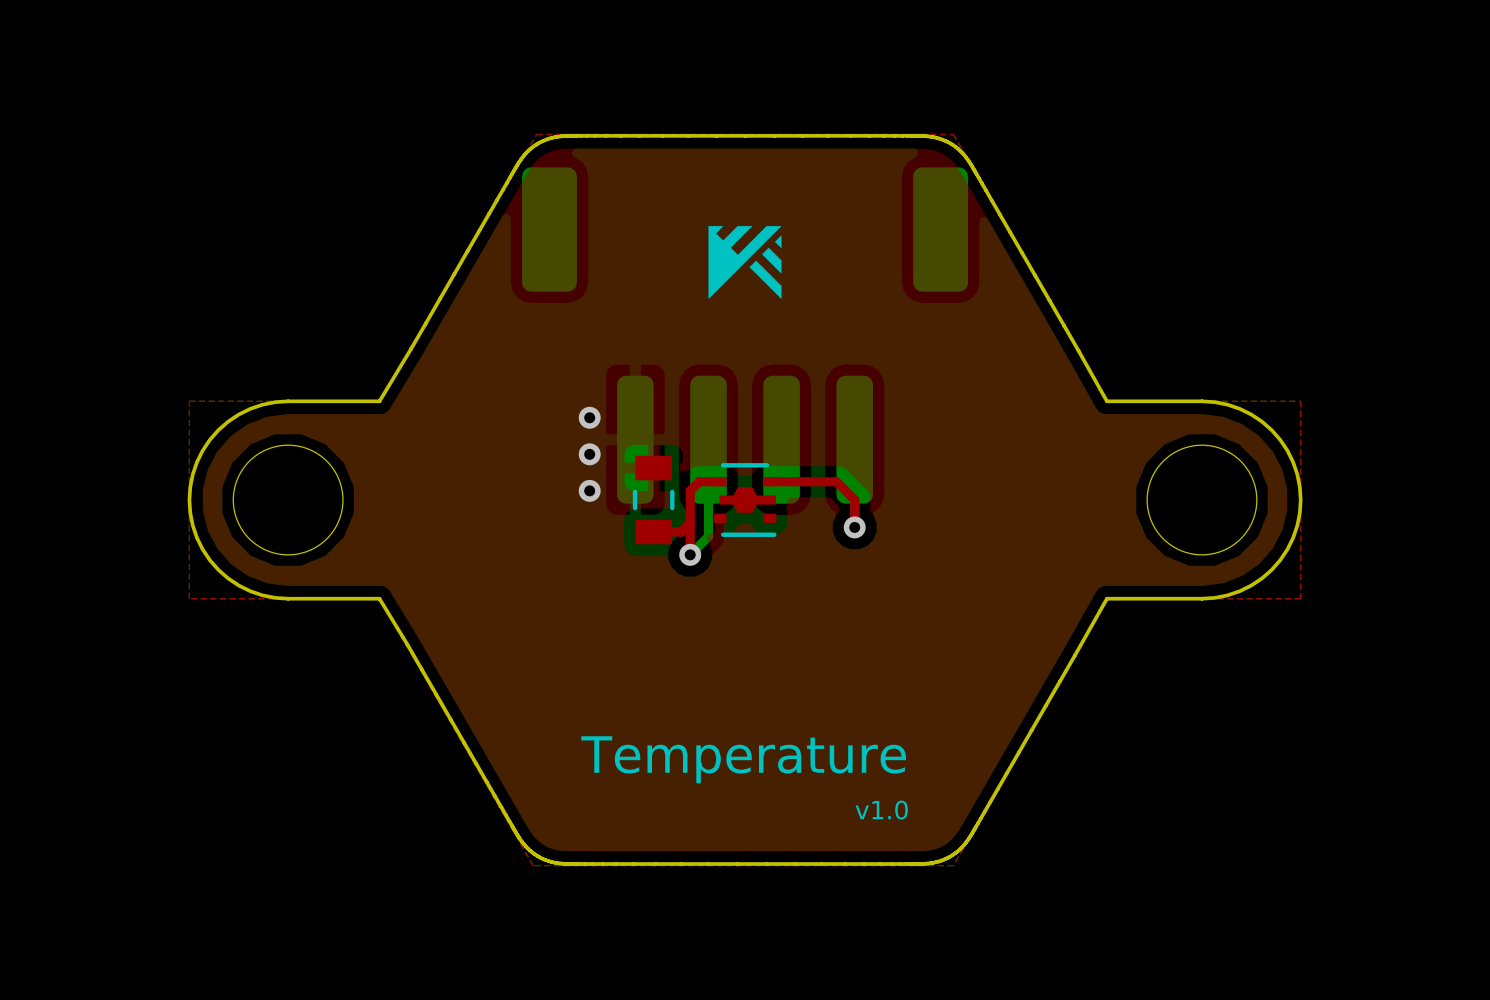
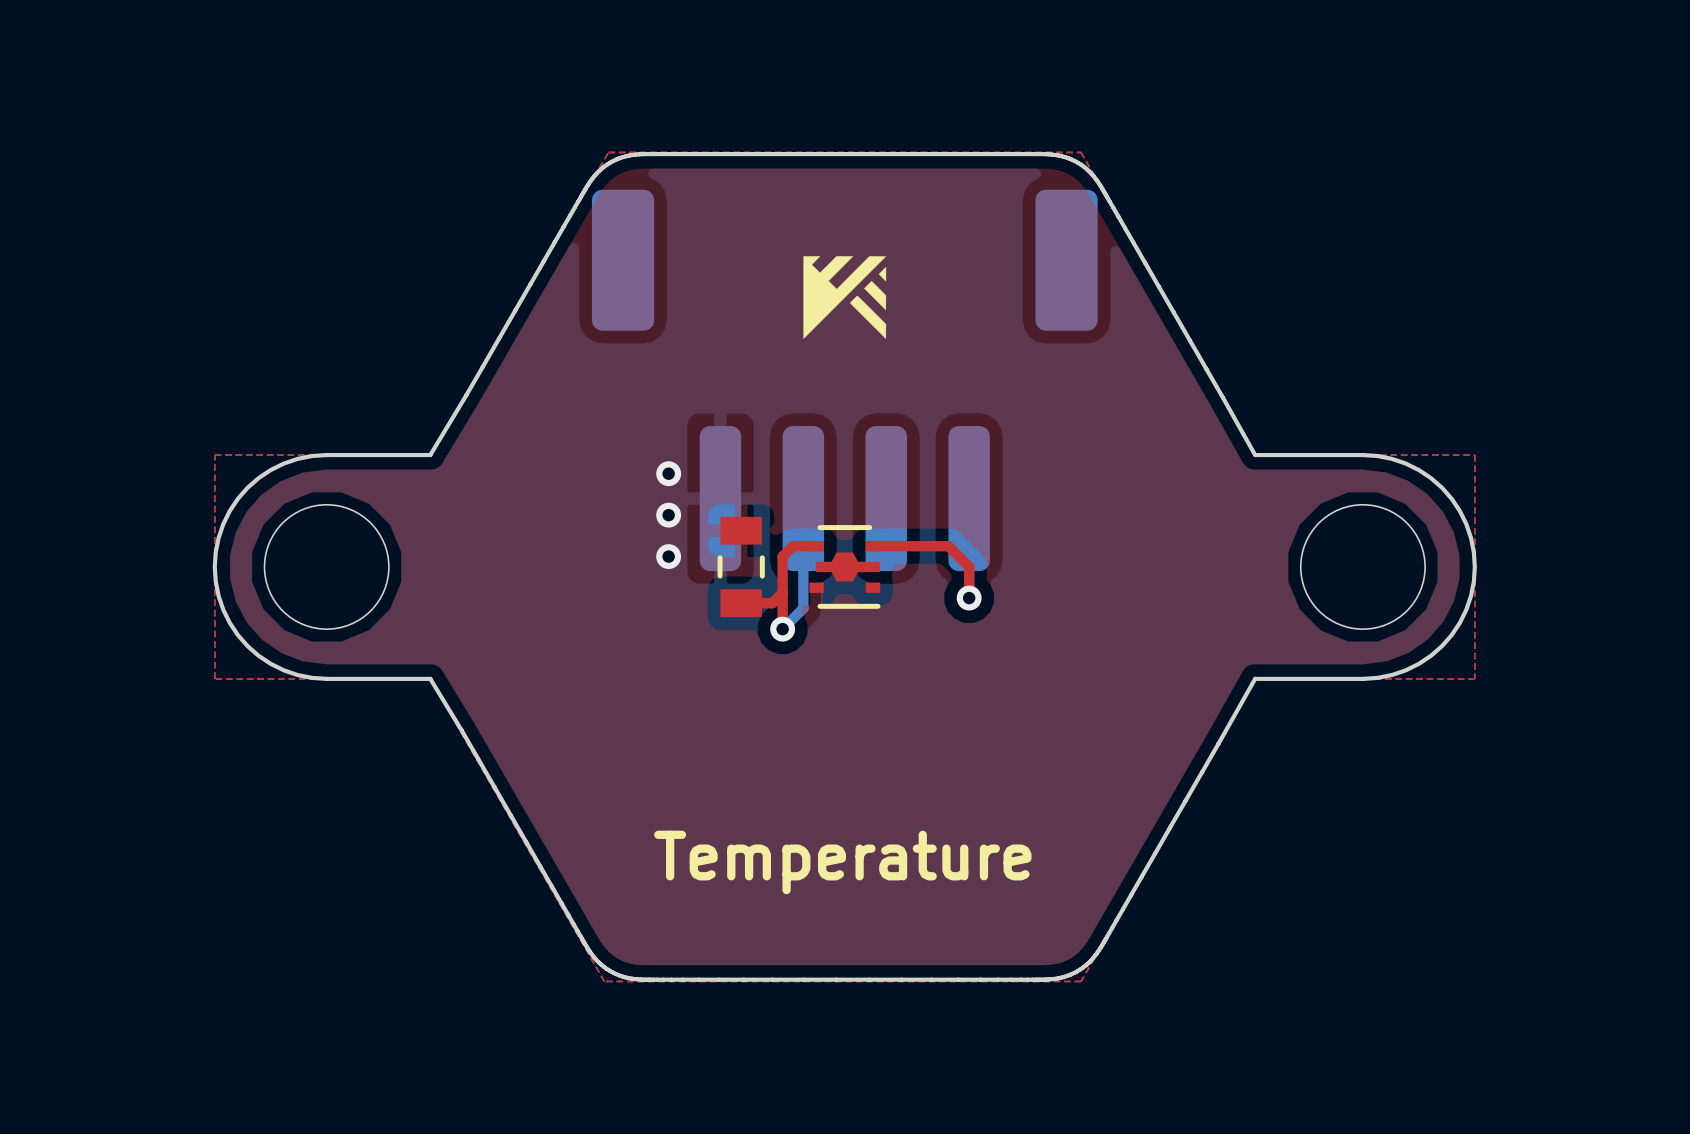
text: v1.0 (881, 810) -> none

